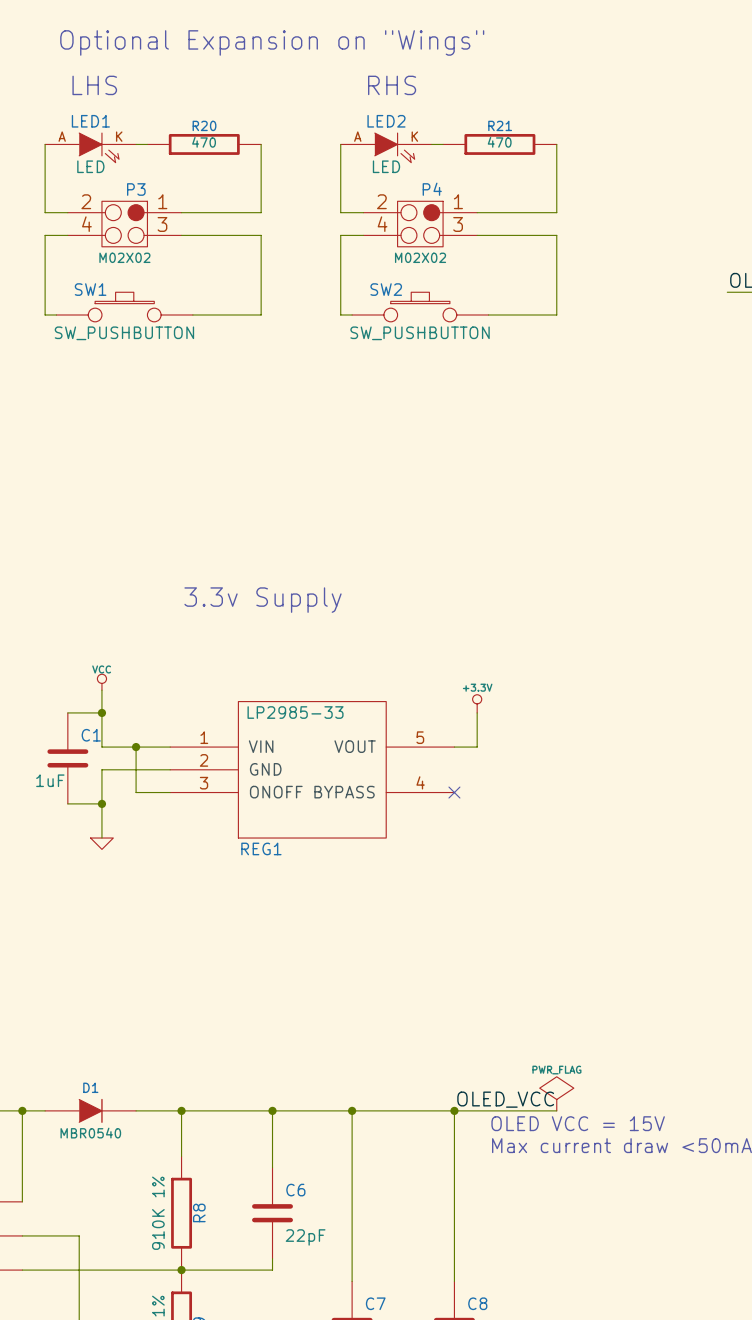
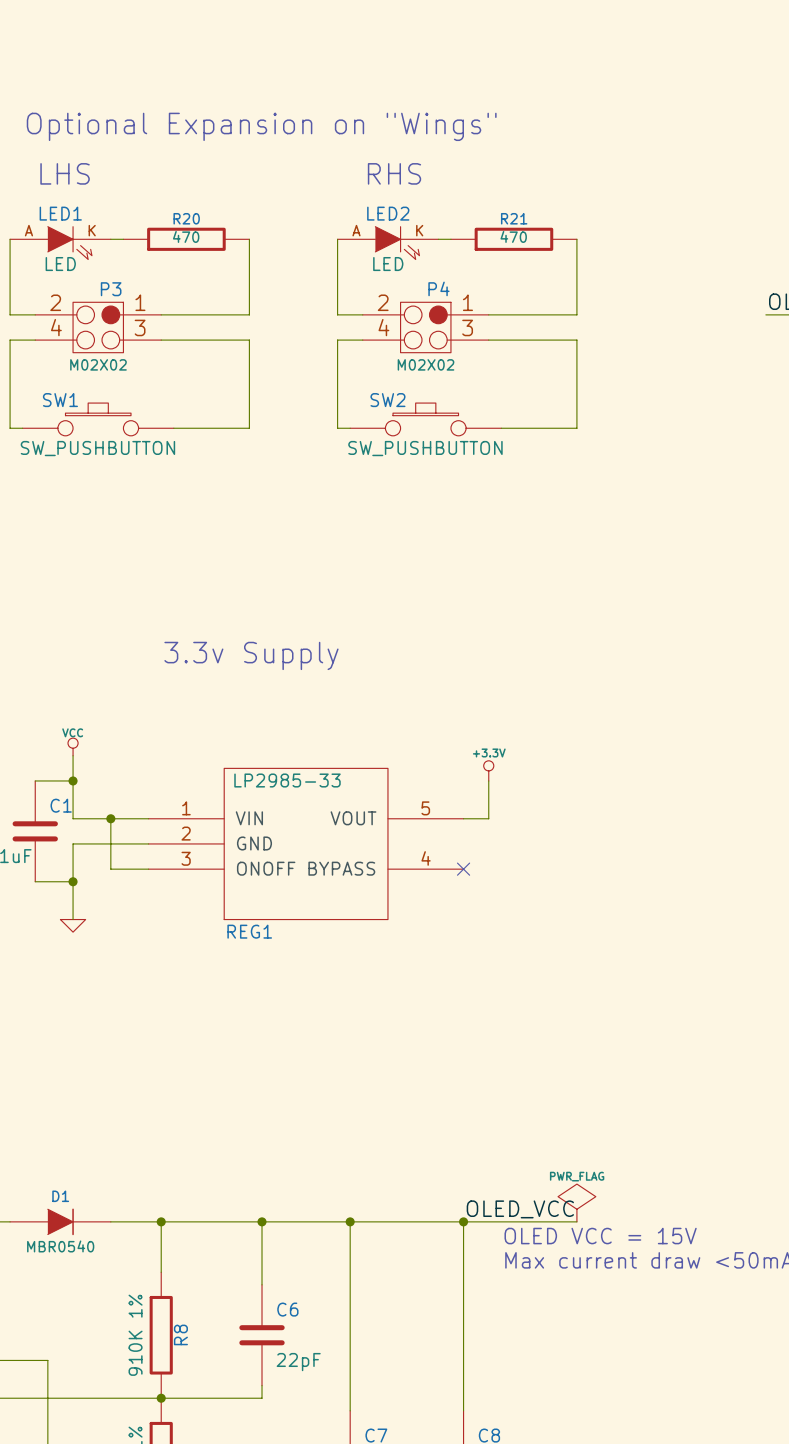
text position: Optional Expansion on "Wings" (272, 42) -> Optional Expansion on "Wings" (261, 126)
text position: LHS (94, 85) -> LHS (65, 173)
text position: RHS (392, 85) -> RHS (394, 173)
wire: (45, 144) (45, 212) (67, 212) -> none
wire: (136, 144) (147, 144) -> (110, 239) (123, 239)
R20 position: (204, 144) -> (186, 239)
wire: (261, 144) (261, 212) (181, 212) -> none
wire: (340, 144) (340, 212) (363, 212) -> none
wire: (431, 144) (443, 144) -> (438, 239) (450, 239)
R21 position: (499, 144) -> (513, 239)
wire: (556, 144) (556, 212) (477, 212) -> none
LED1 position: (90, 147) -> (60, 243)
LED2 position: (386, 147) -> (387, 243)
P3 position: (124, 224) -> (98, 327)
P4 position: (420, 224) -> (425, 327)
wire: (45, 235) (67, 235) -> (10, 251) (10, 239)
wire: (181, 235) (261, 235) -> (249, 239) (249, 251)
wire: (340, 235) (363, 235) -> (337, 251) (337, 239)
wire: (477, 235) (556, 235) -> (576, 239) (576, 251)
wire: (45, 292) (45, 315) -> (10, 314) (35, 314)
wire: (261, 292) (261, 315) -> (249, 314) (161, 314)
wire: (340, 292) (340, 315) -> (337, 314) (362, 314)
wire: (556, 292) (556, 315) -> (576, 314) (488, 314)
SW1 position: (124, 307) -> (98, 419)
SW2 position: (420, 307) -> (425, 419)
wire: none -> (10, 340) (10, 428) (22, 428)
wire: none -> (249, 340) (249, 428) (173, 428)
wire: none -> (337, 340) (337, 428) (350, 428)
wire: none -> (576, 340) (576, 428) (501, 428)

